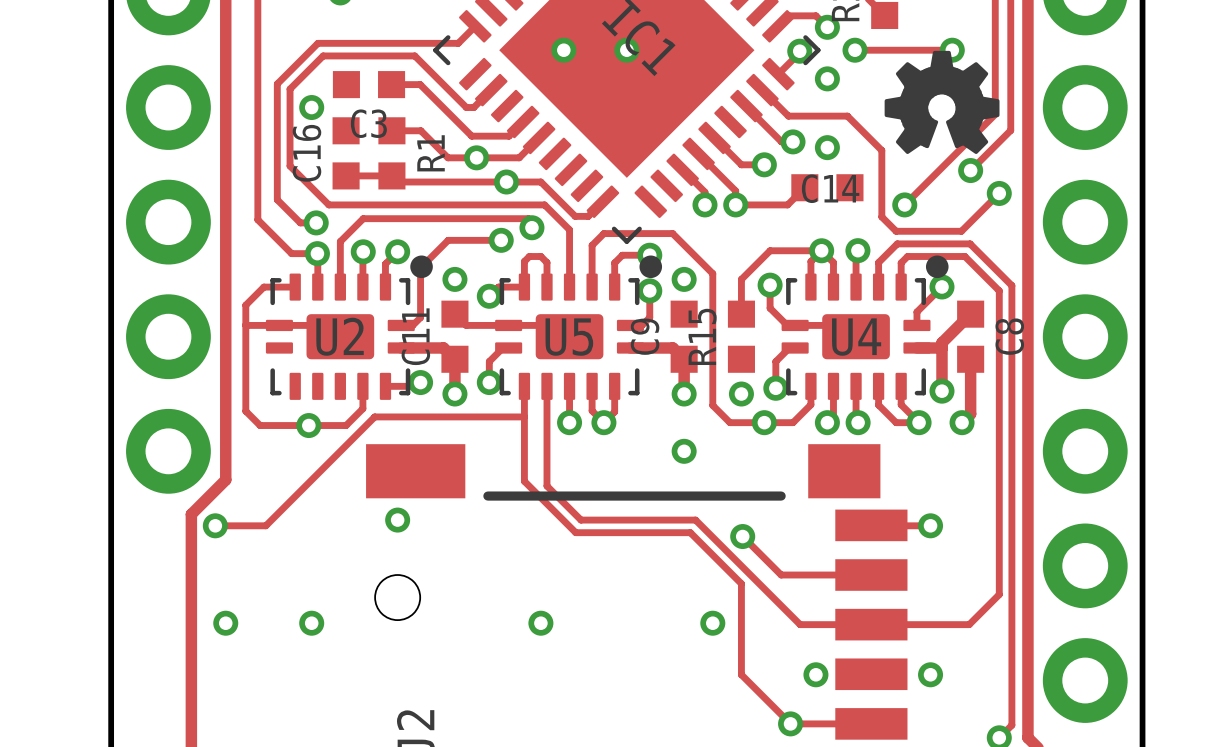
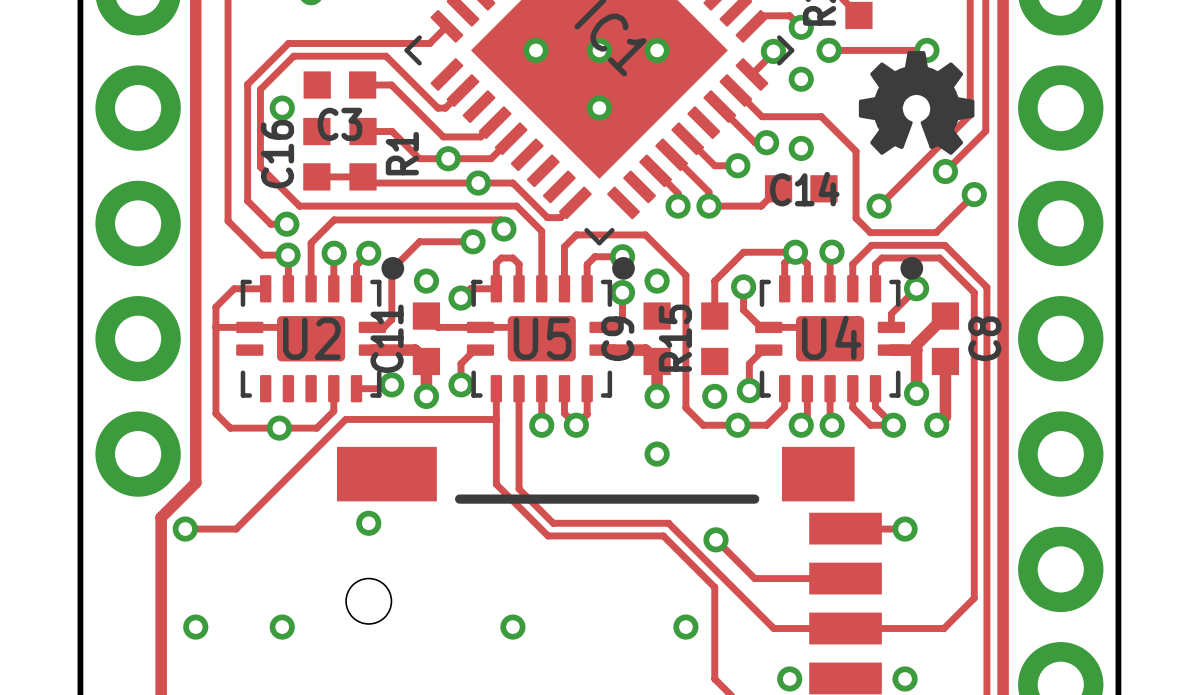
via: none -> (657, 50)
via: none -> (599, 108)

